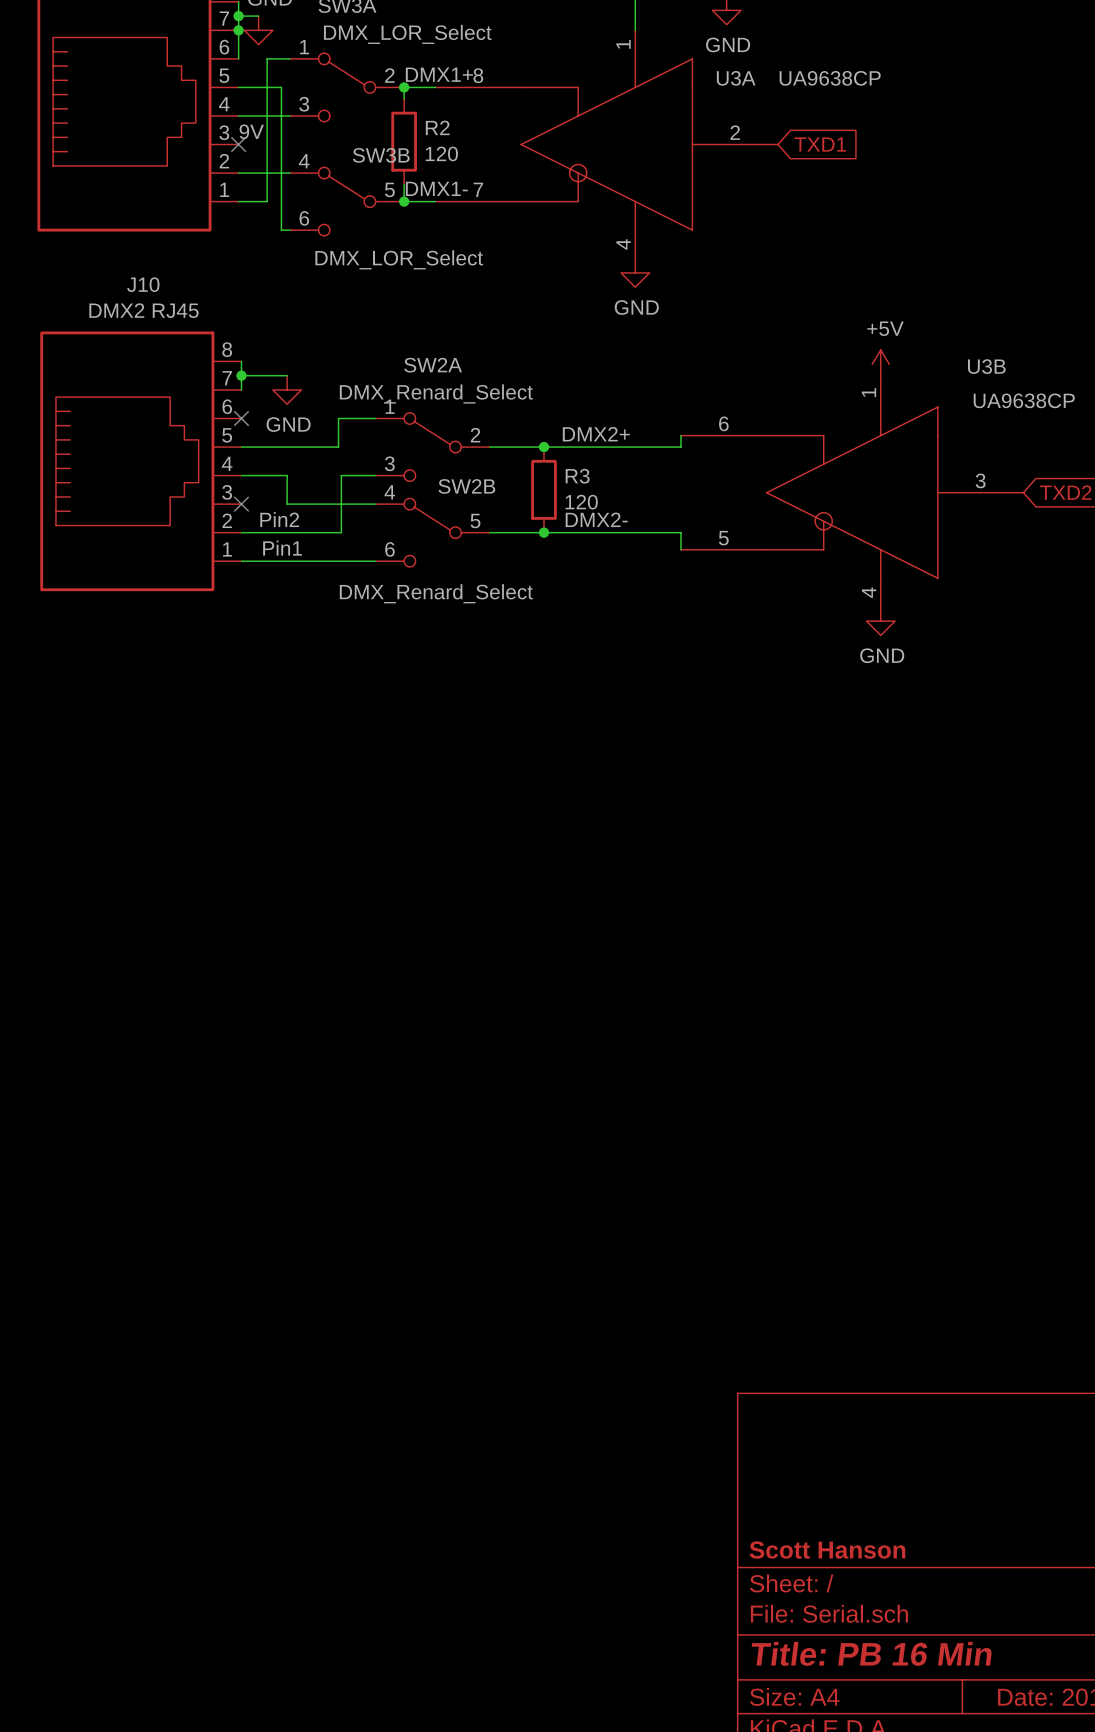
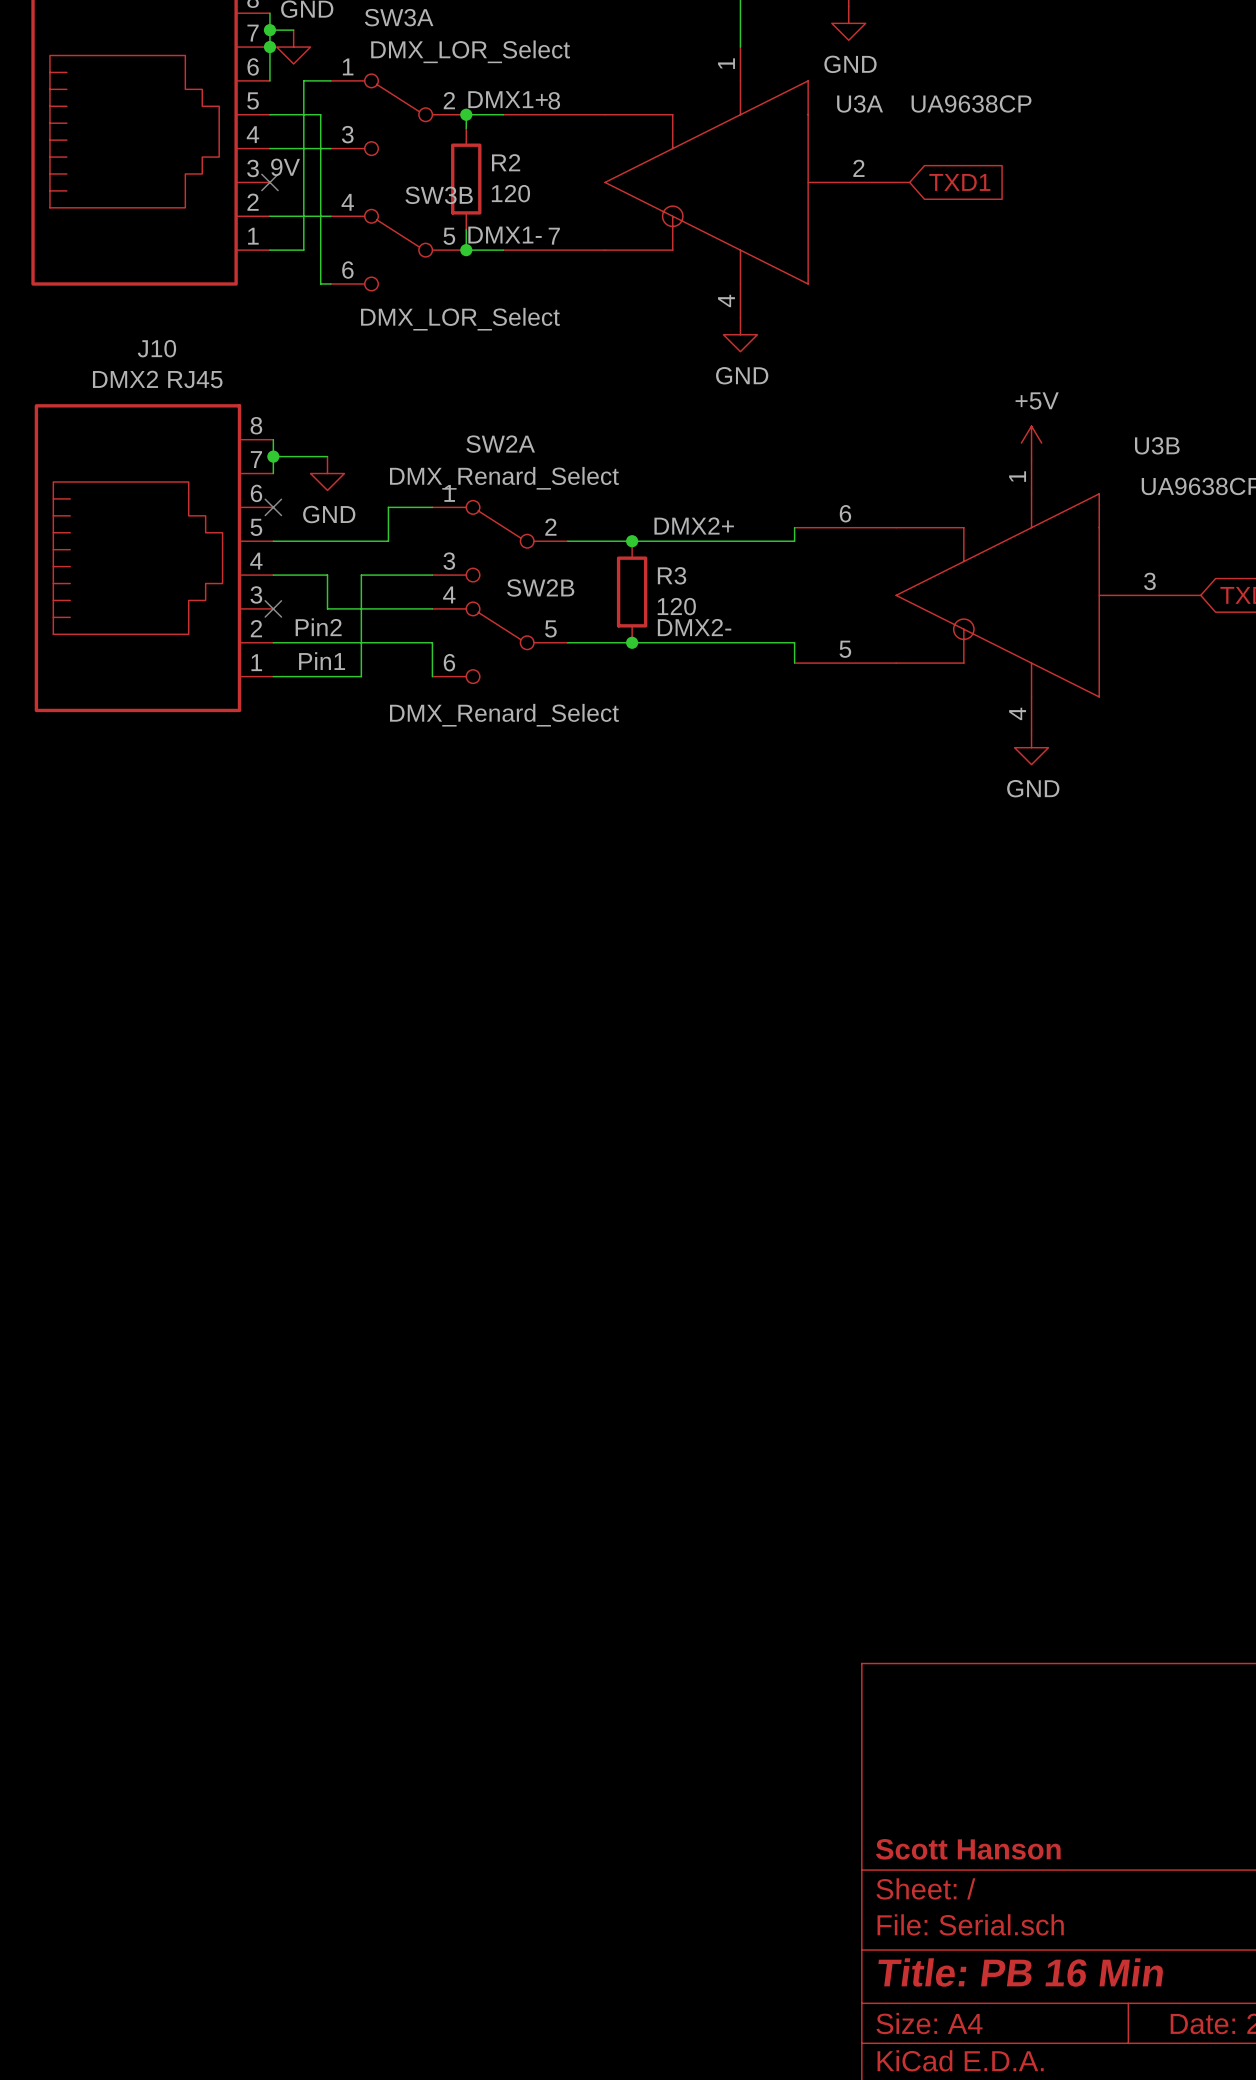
wire: (341, 475) (341, 532) -> (391, 575) (361, 575) (361, 676)
wire: (315, 561) (375, 561) -> (391, 642) (432, 642) (432, 676)

